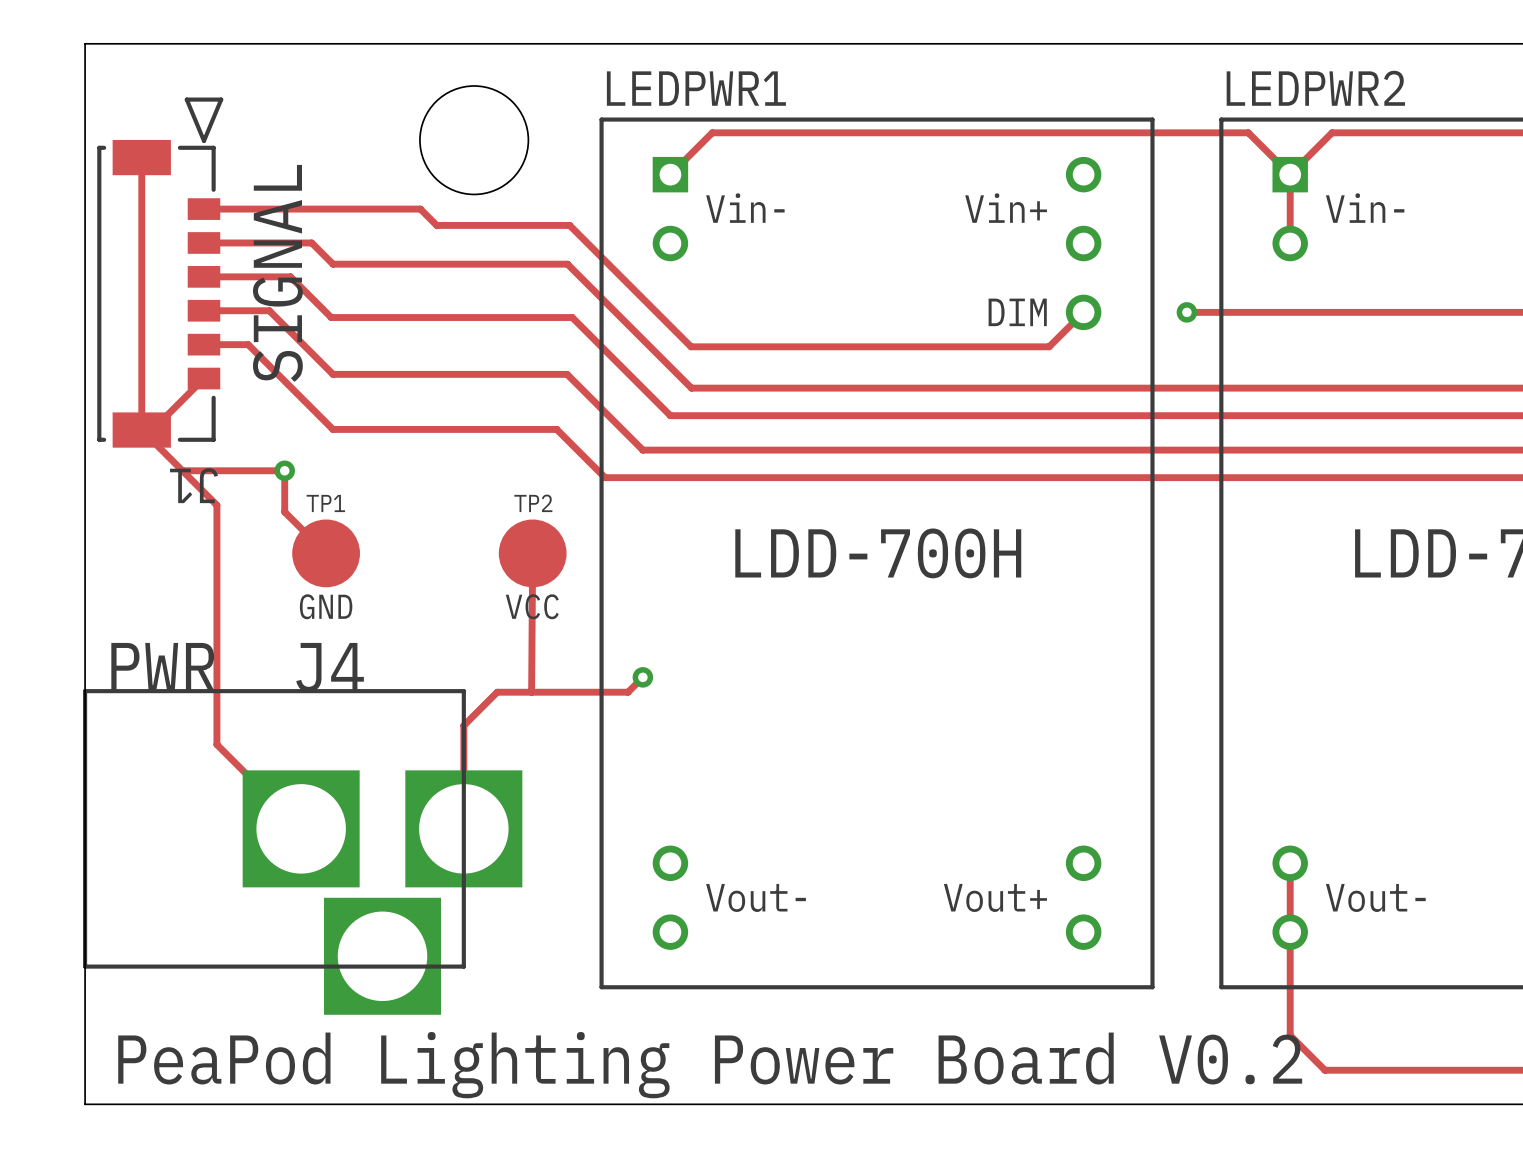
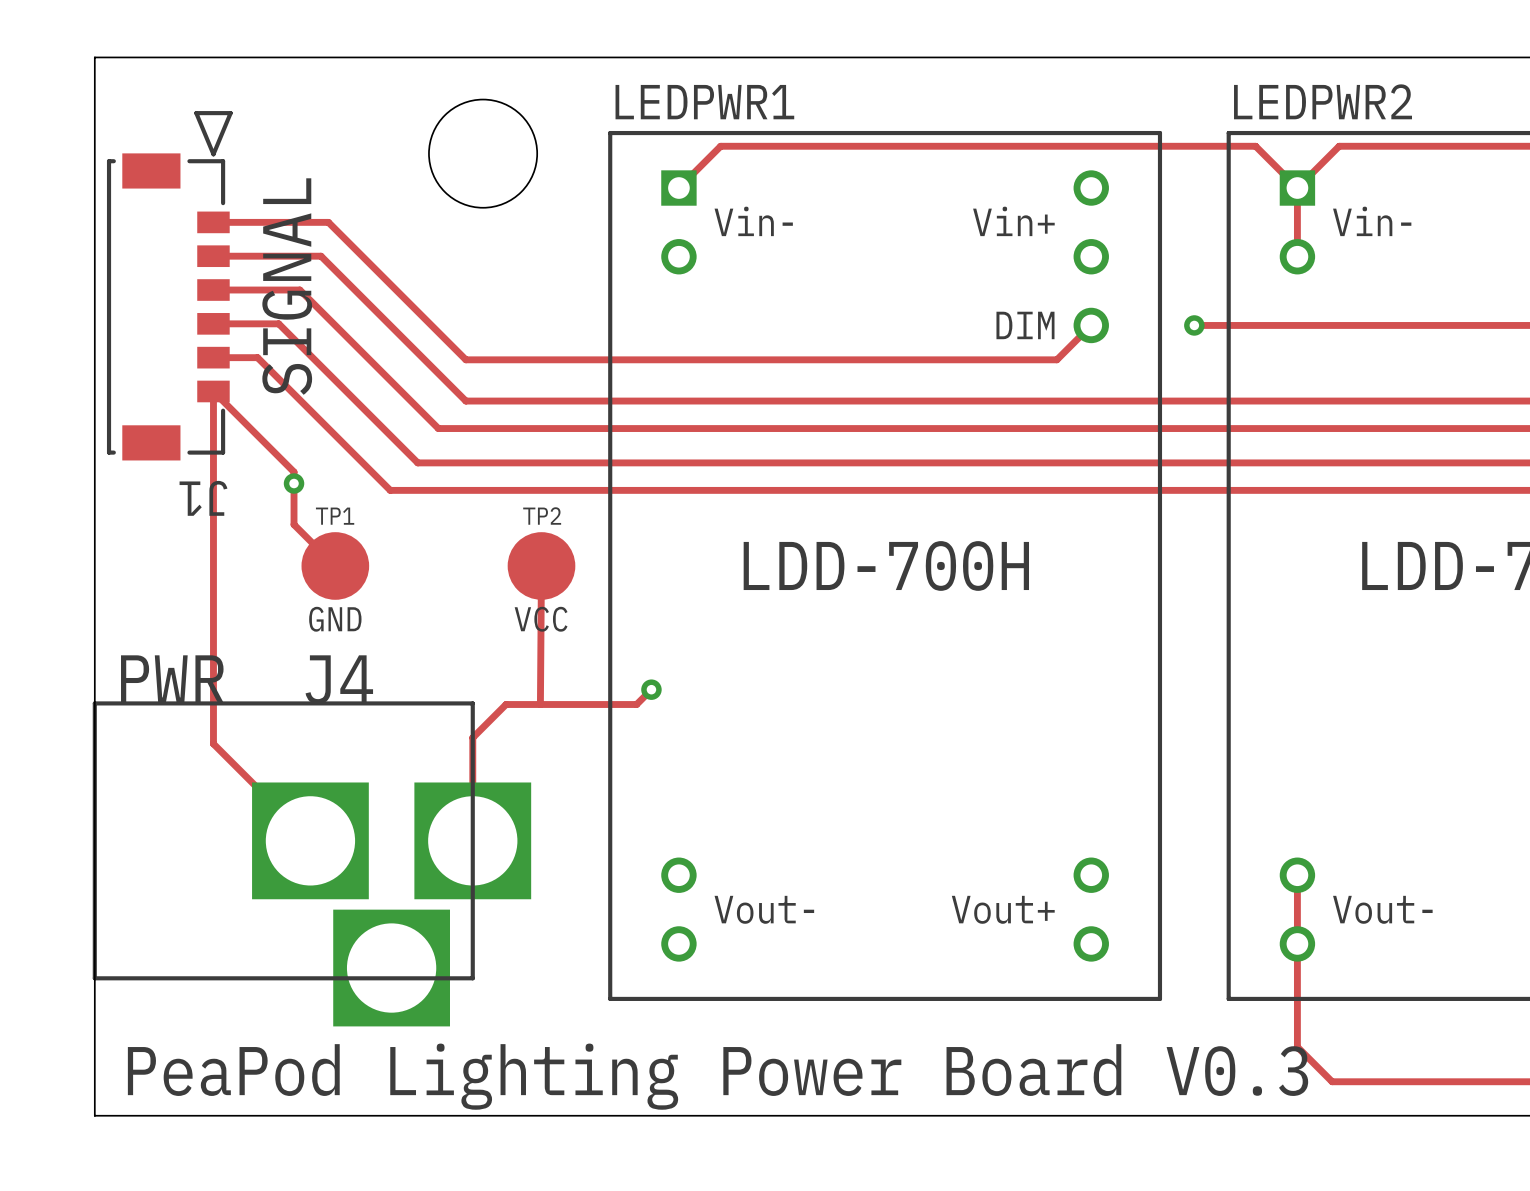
track: (141, 157) (141, 430) -> none
track: (319, 209) (420, 209) (436, 225) (569, 225) (691, 346) -> (328, 222) (465, 359) (699, 359)
track: (332, 264) (567, 264) (691, 388) -> (342, 277) (465, 401) (699, 401)
track: (331, 317) (572, 317) (670, 415) -> (340, 330) (438, 428) (678, 428)
track: (332, 374) (567, 374) (642, 450) -> (342, 387) (417, 462) (651, 462)
track: (203, 378) (152, 430) (141, 430) -> none
track: (332, 429) (556, 429) (605, 477) -> (342, 442) (390, 490) (613, 490)
track: (141, 430) (216, 505) (216, 744) -> (294, 483) (294, 472) (213, 391) (213, 743) (226, 756)
track: (182, 470) (284, 470) -> none
text: PeaPod Lighting Power Board V0.2 (710, 1065) -> PeaPod Lighting Power Board V0.3 (718, 1076)

